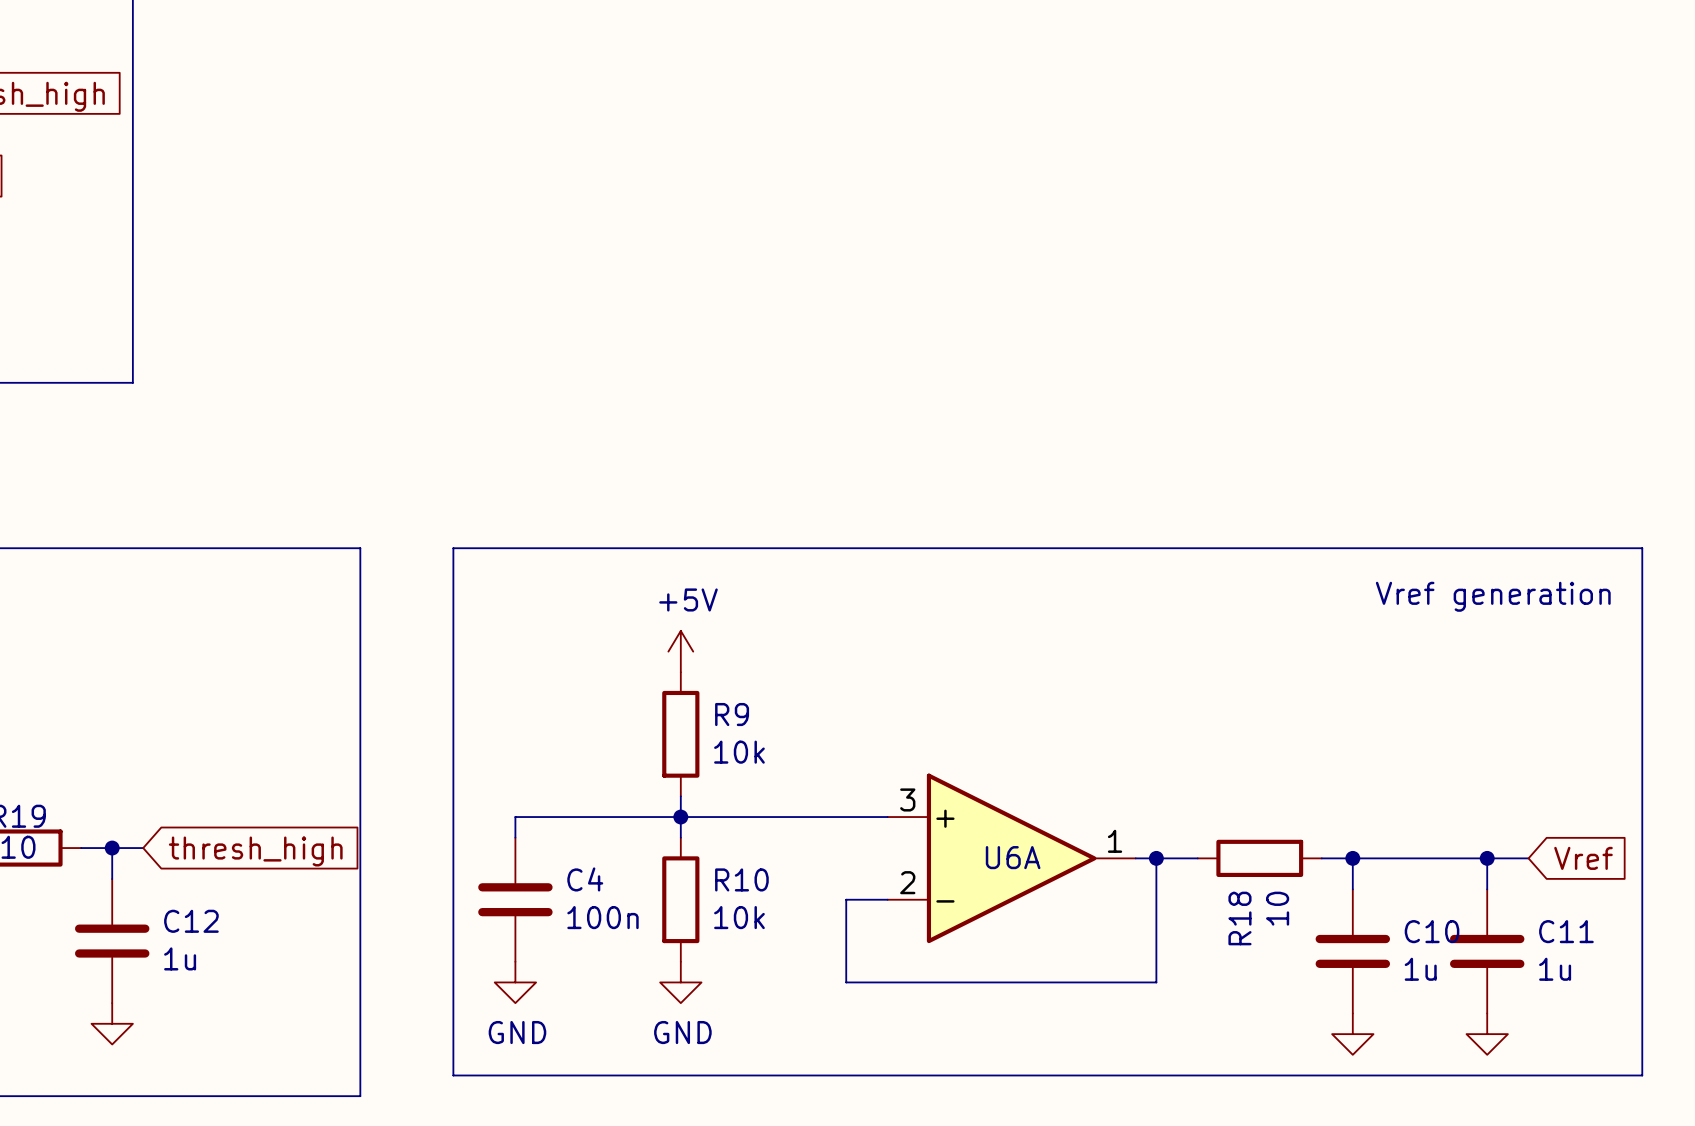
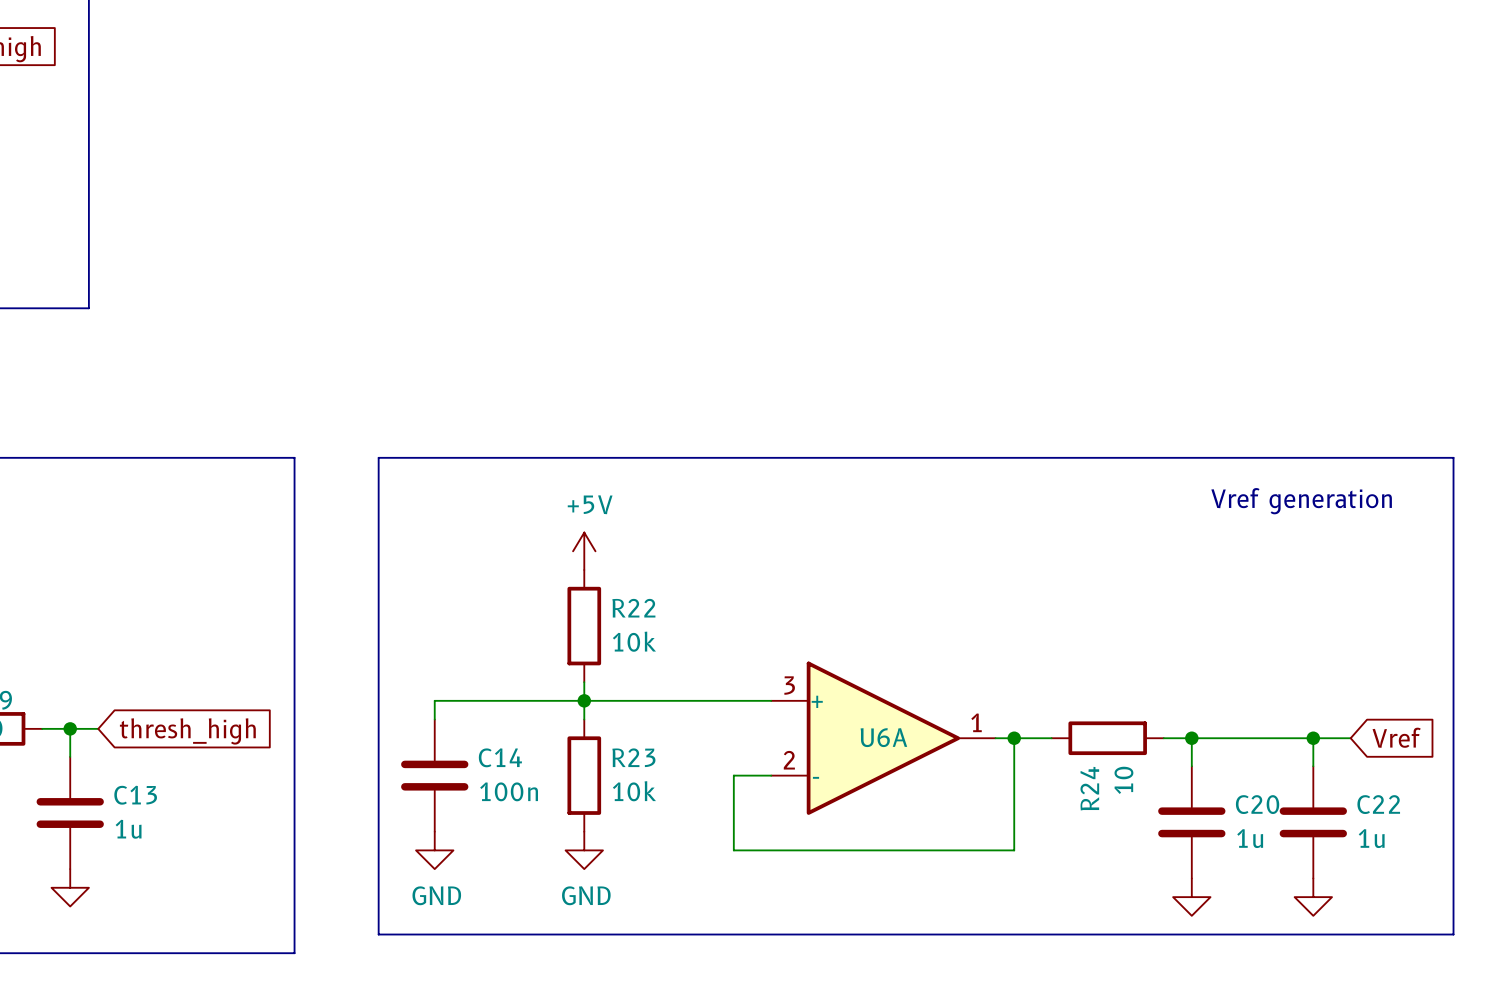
R9 name: R9 (732, 714) -> R22 (633, 608)
C4 name: C4 (585, 879) -> C14 (500, 757)
R10 name: R10 (741, 879) -> R23 (633, 757)
R18 name: R18 (1239, 918) -> R24 (1089, 788)
C12 name: C12 (191, 921) -> C13 (135, 795)
C10 name: C10 (1432, 931) -> C20 (1257, 804)
C11 name: C11 (1566, 931) -> C22 (1378, 804)

